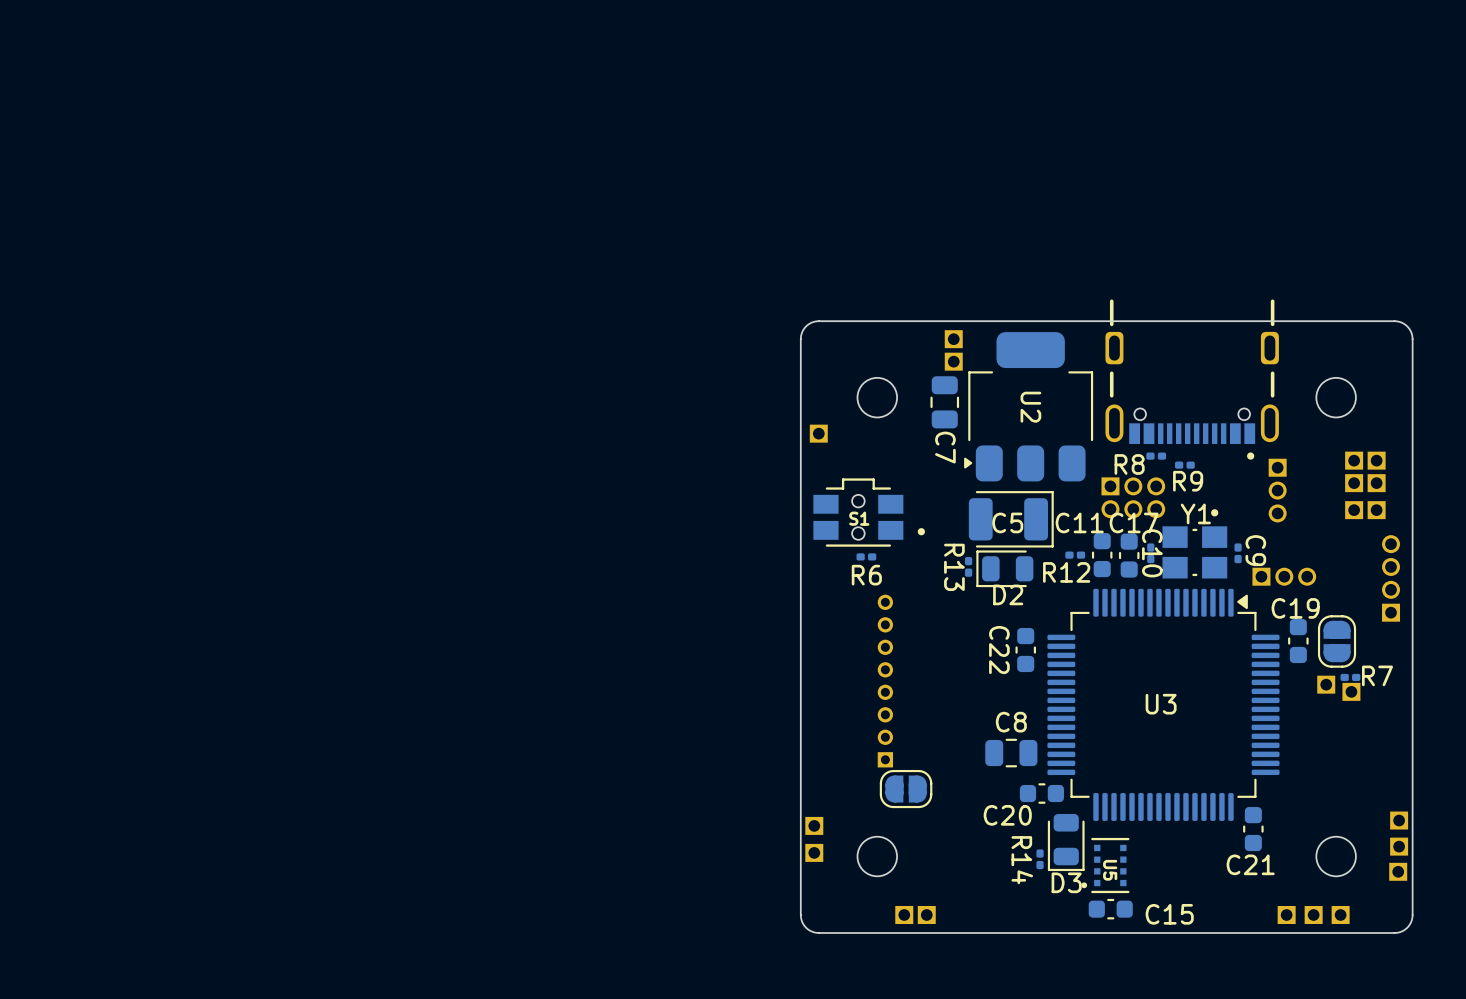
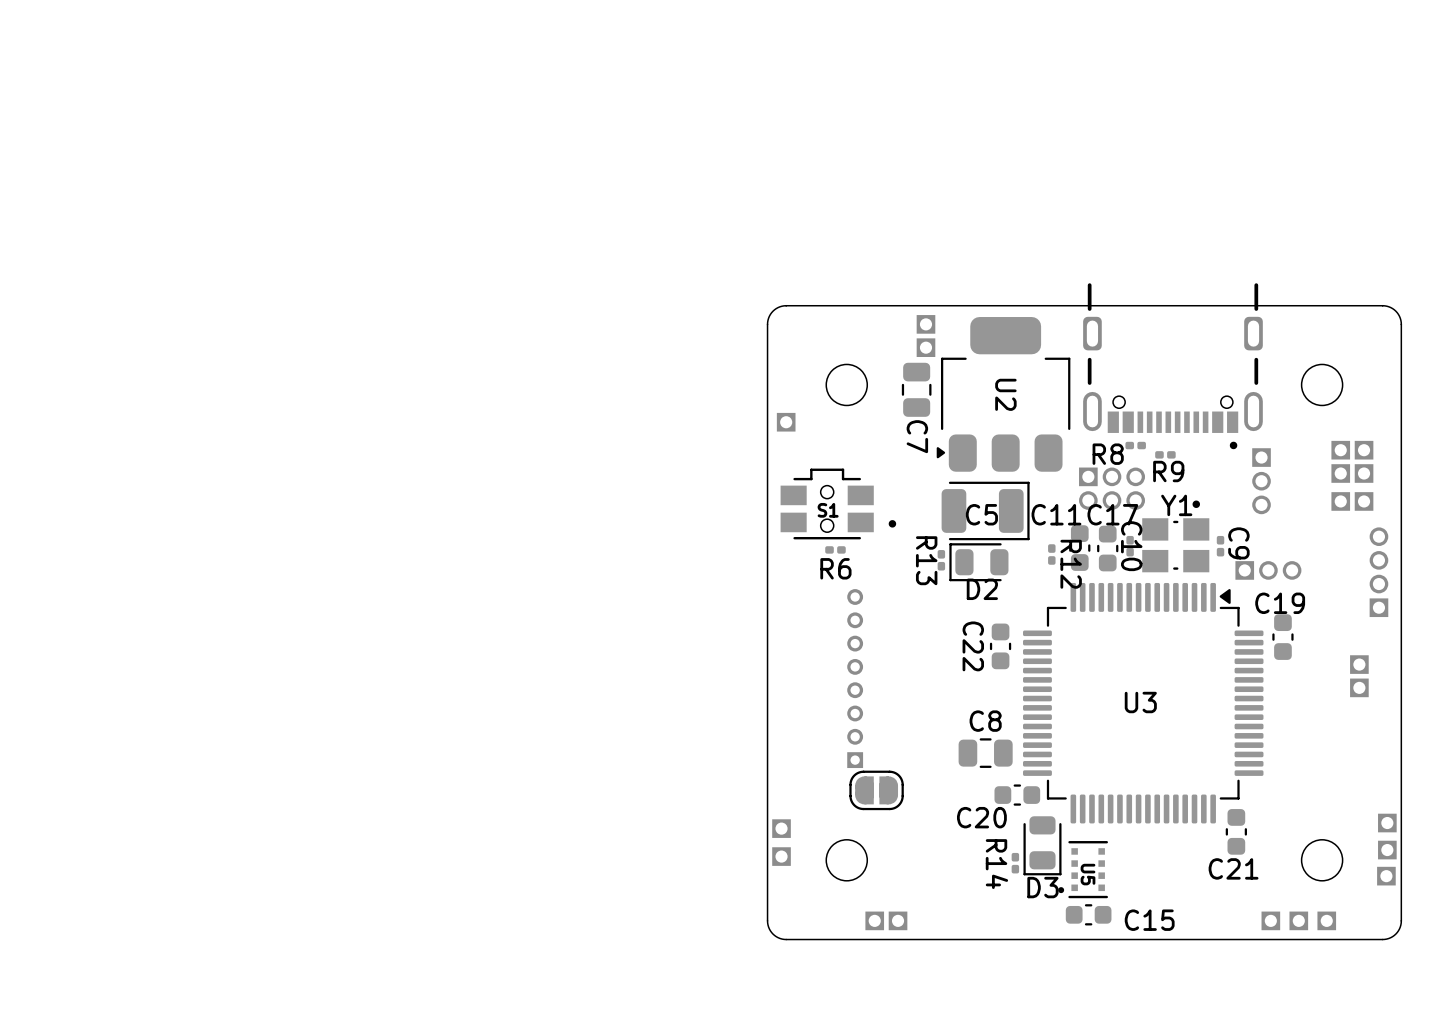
R12 rotation: 0° (1075, 555) -> 90° clockwise (1051, 554)
part: (1337, 641) -> none
part: none -> (1359, 664)
R7: (1350, 677) -> none
part: (1326, 684) -> none
part: none -> (1359, 687)
part: (1351, 691) -> none

